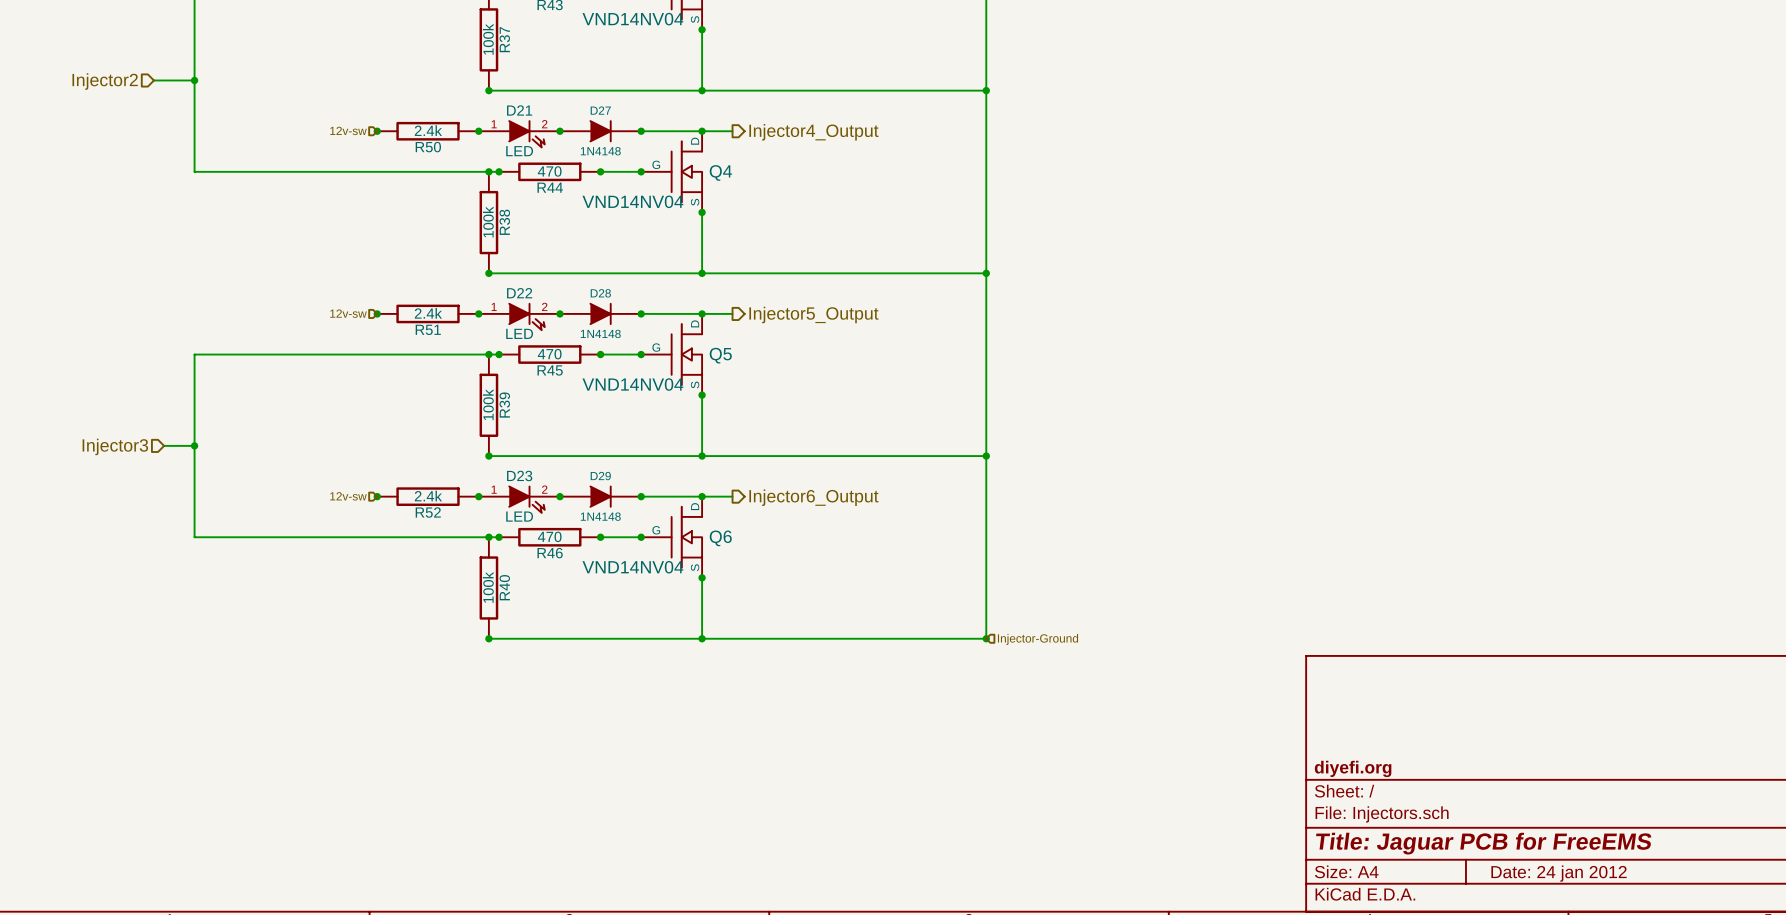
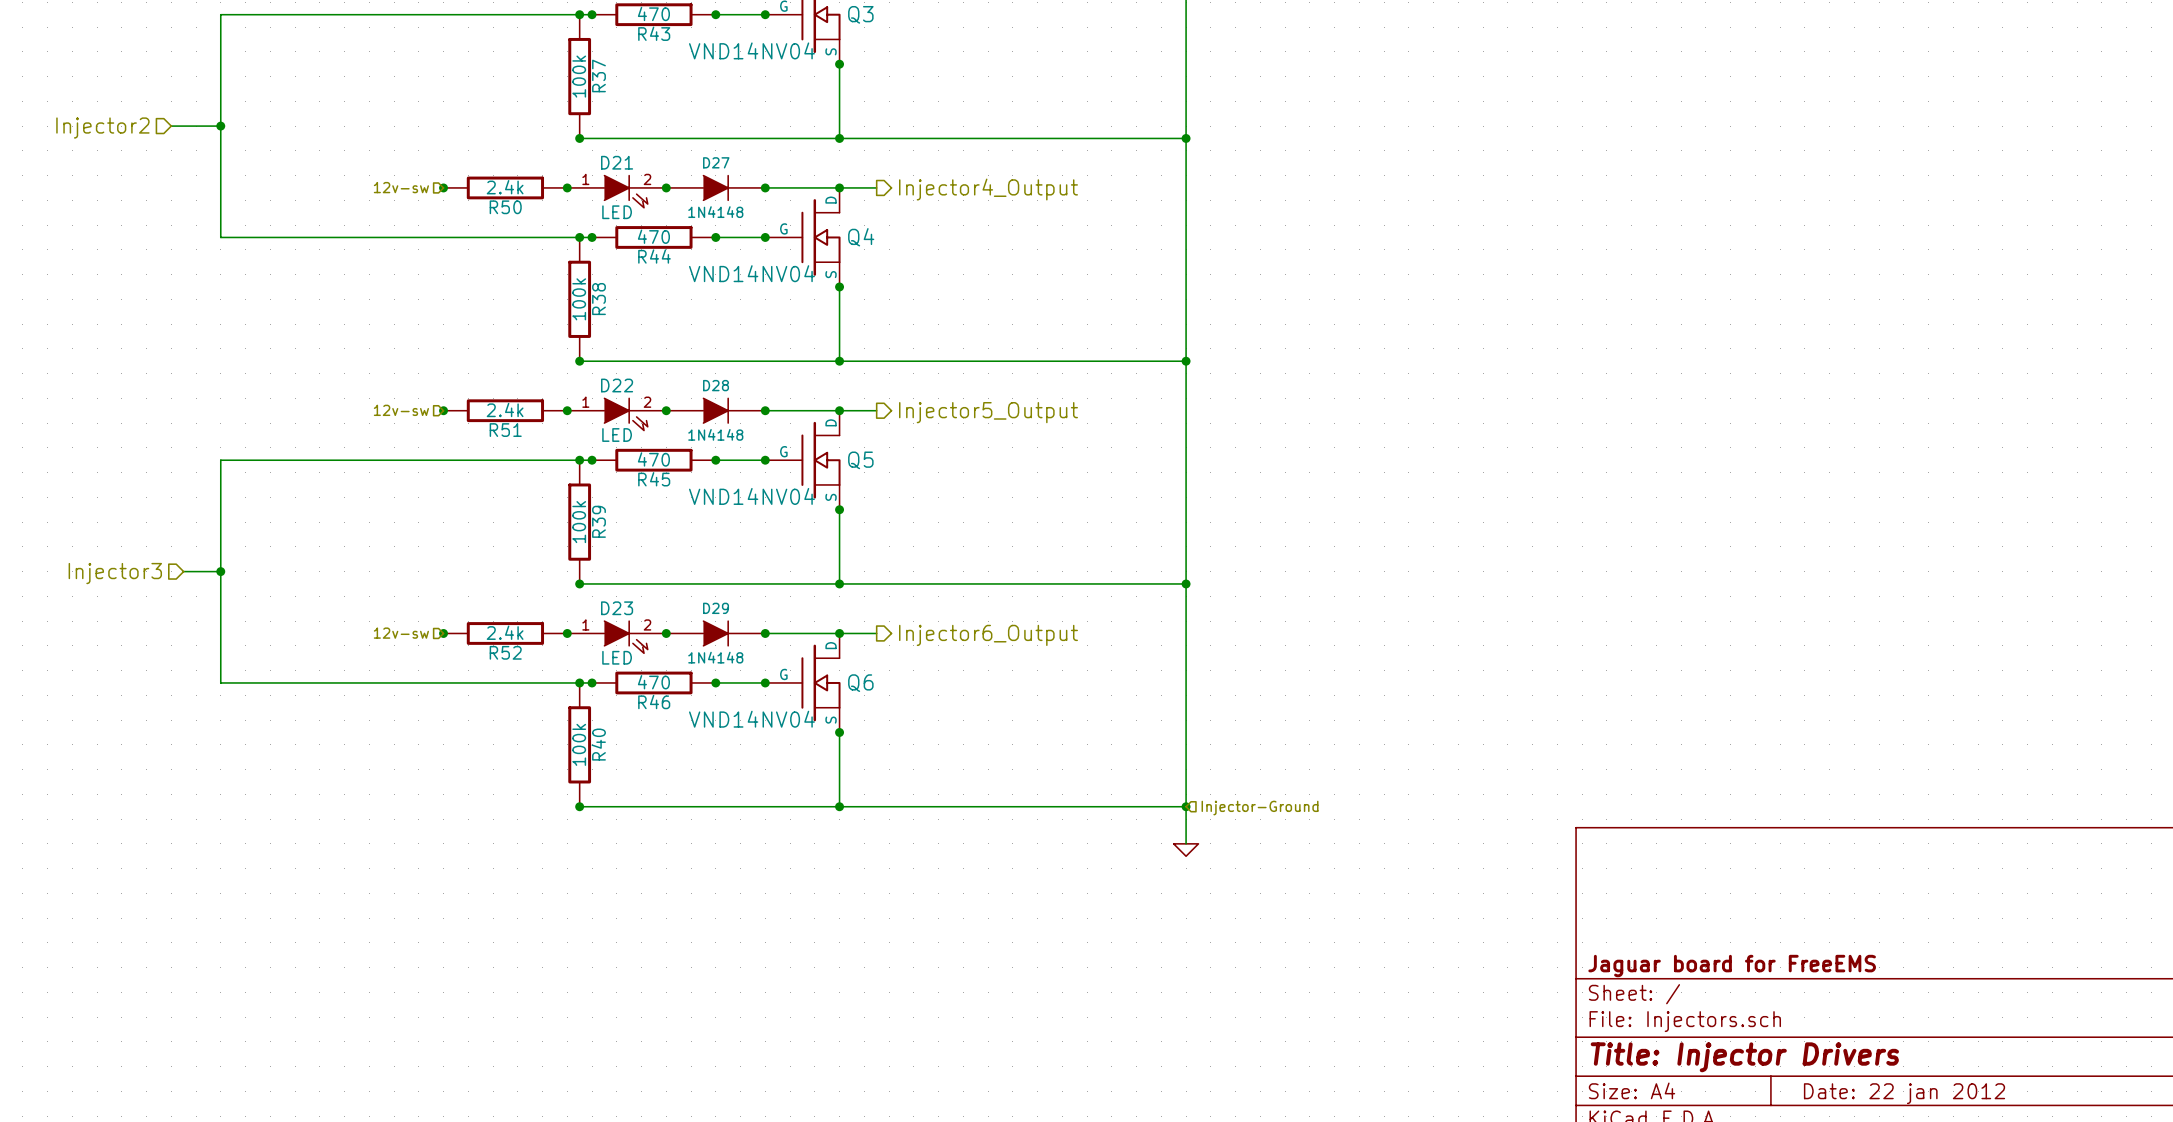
wire: none -> (1186, 806) (1186, 843)
power symbol: none -> (1186, 850)
title block: diyefi.org (1353, 768) -> Jaguar board for FreeEMS (1732, 966)
title block: Title: Jaguar PCB for FreeEMS (1483, 843) -> Title: Injector Drivers (1744, 1057)
title block: Date: 24 jan 2012 (1559, 873) -> Date: 22 jan 2012 (1904, 1093)

